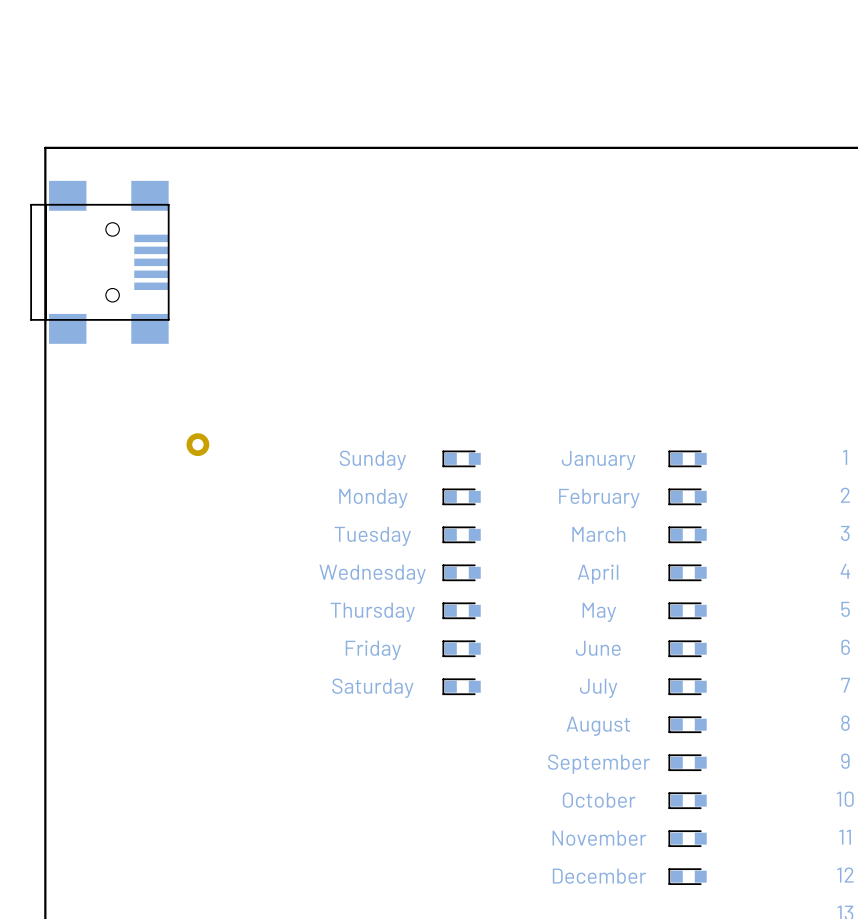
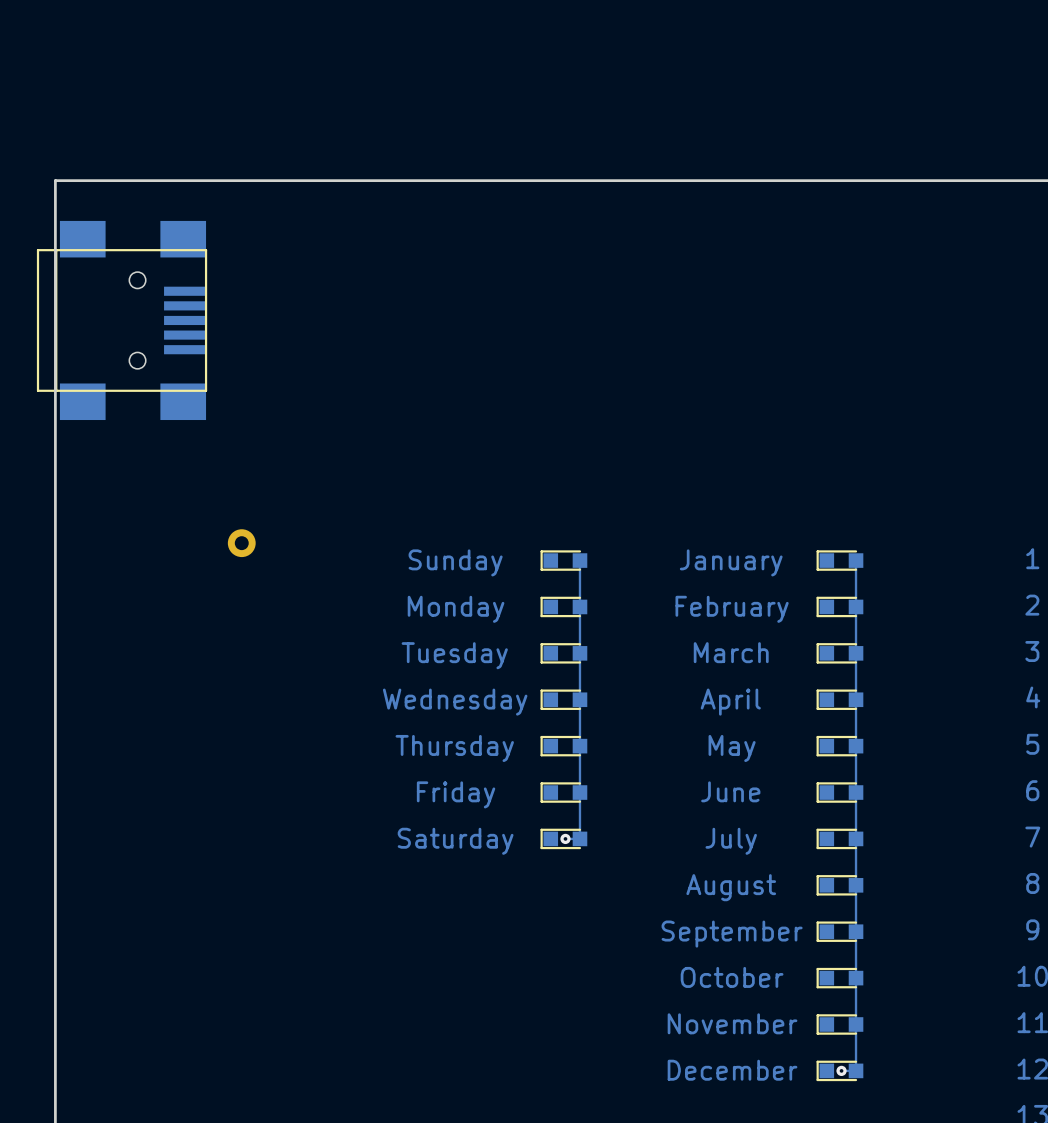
track: none -> (579, 560) (579, 838) (565, 838)
track: none -> (856, 560) (856, 1070) (841, 1070)
via: none -> (565, 838)
via: none -> (841, 1070)

